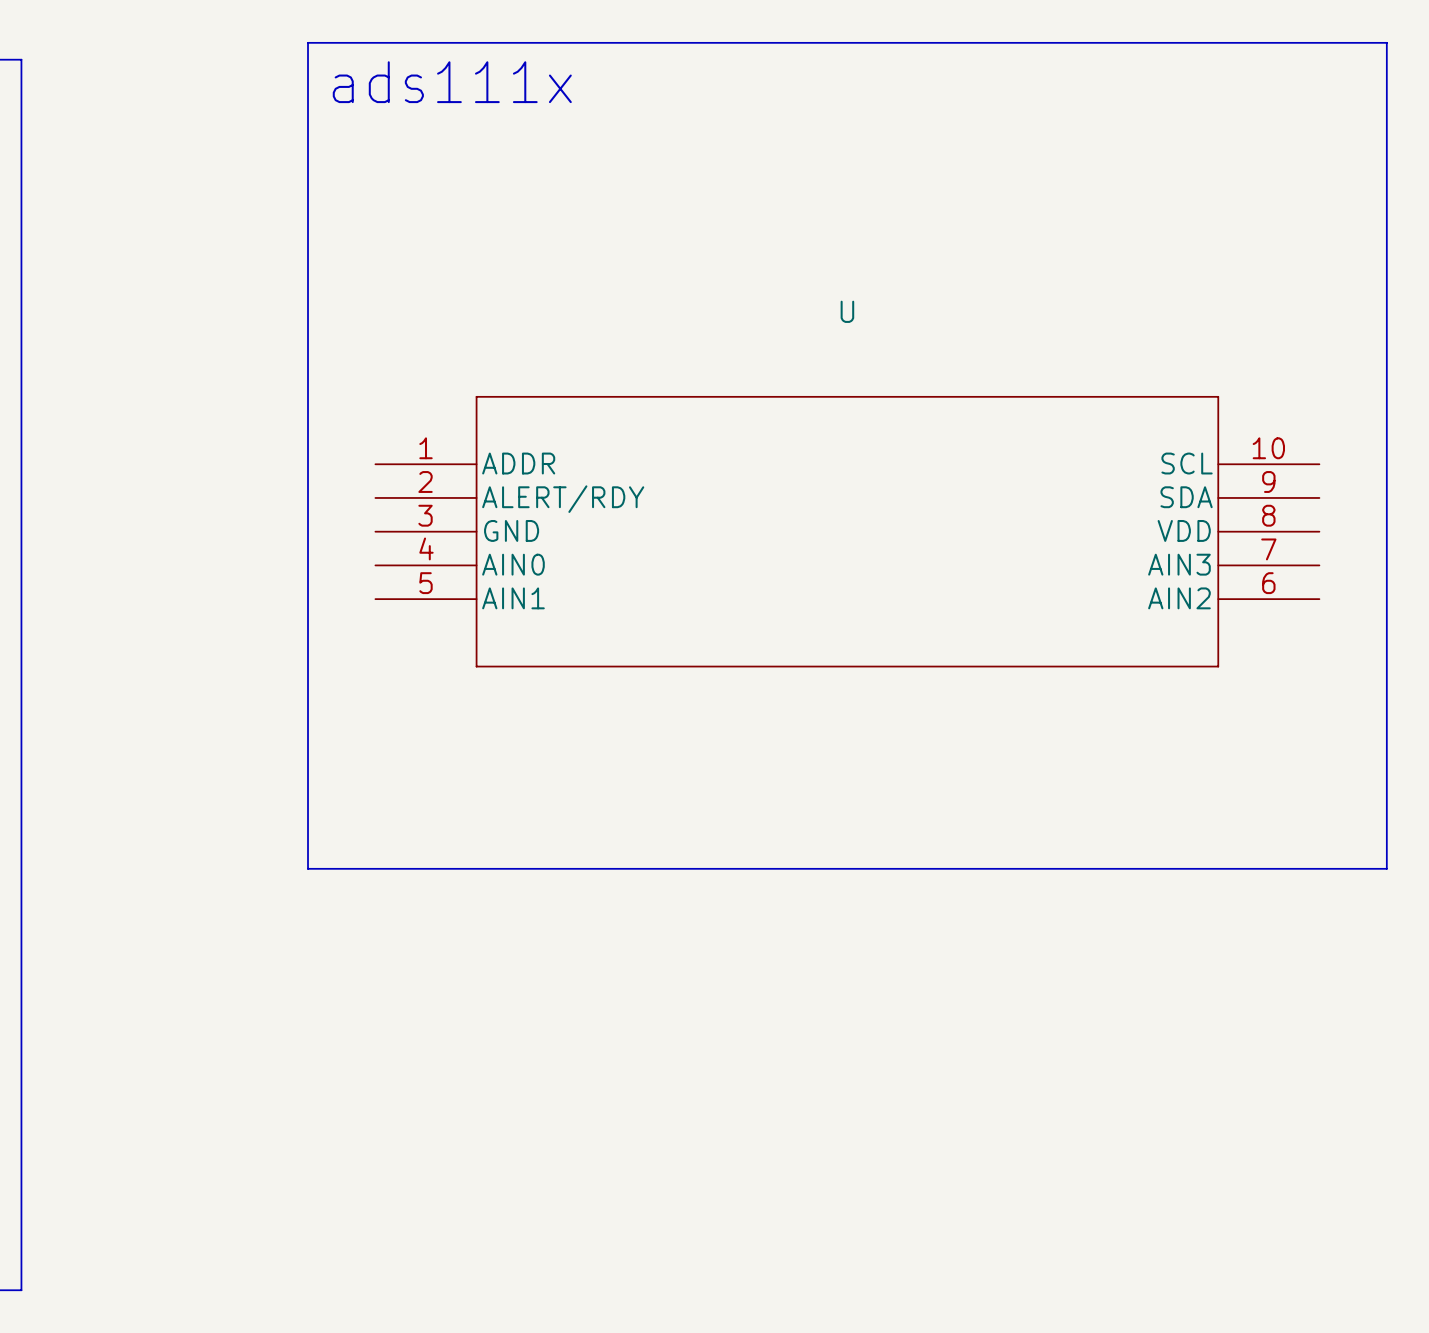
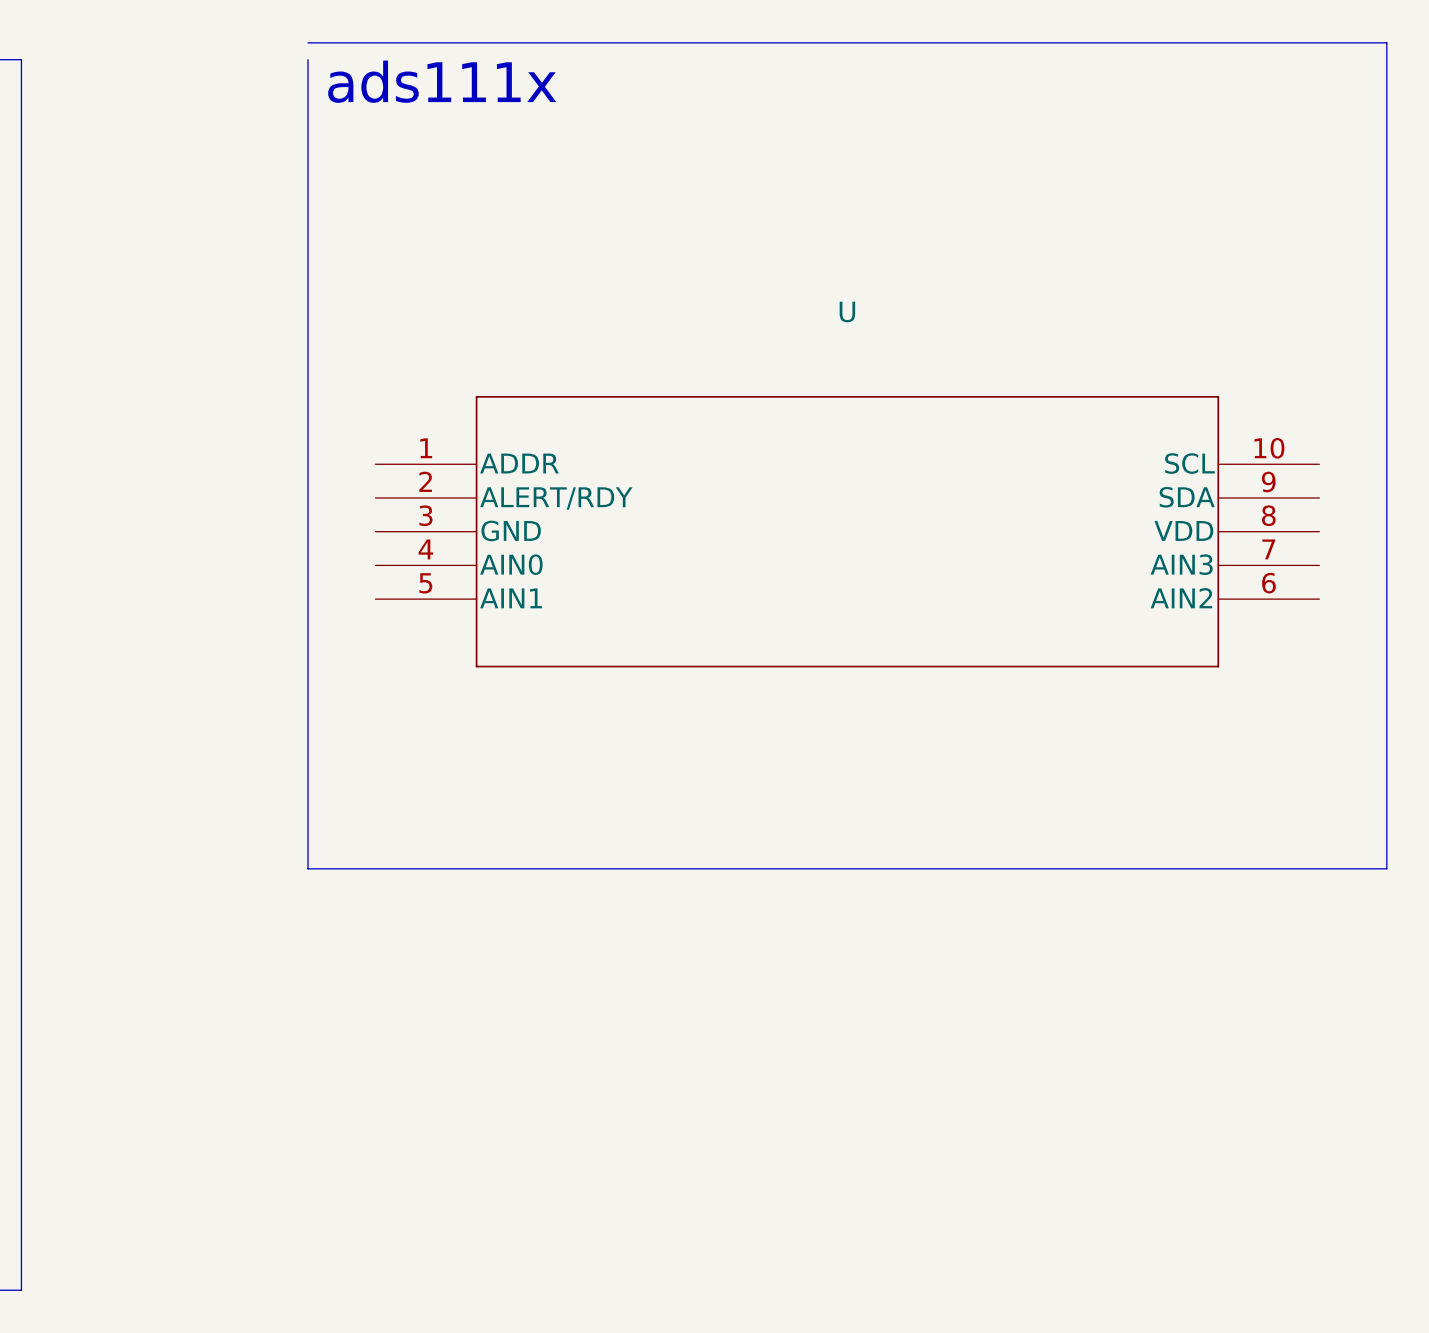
line: (308, 42) (308, 59) -> none

